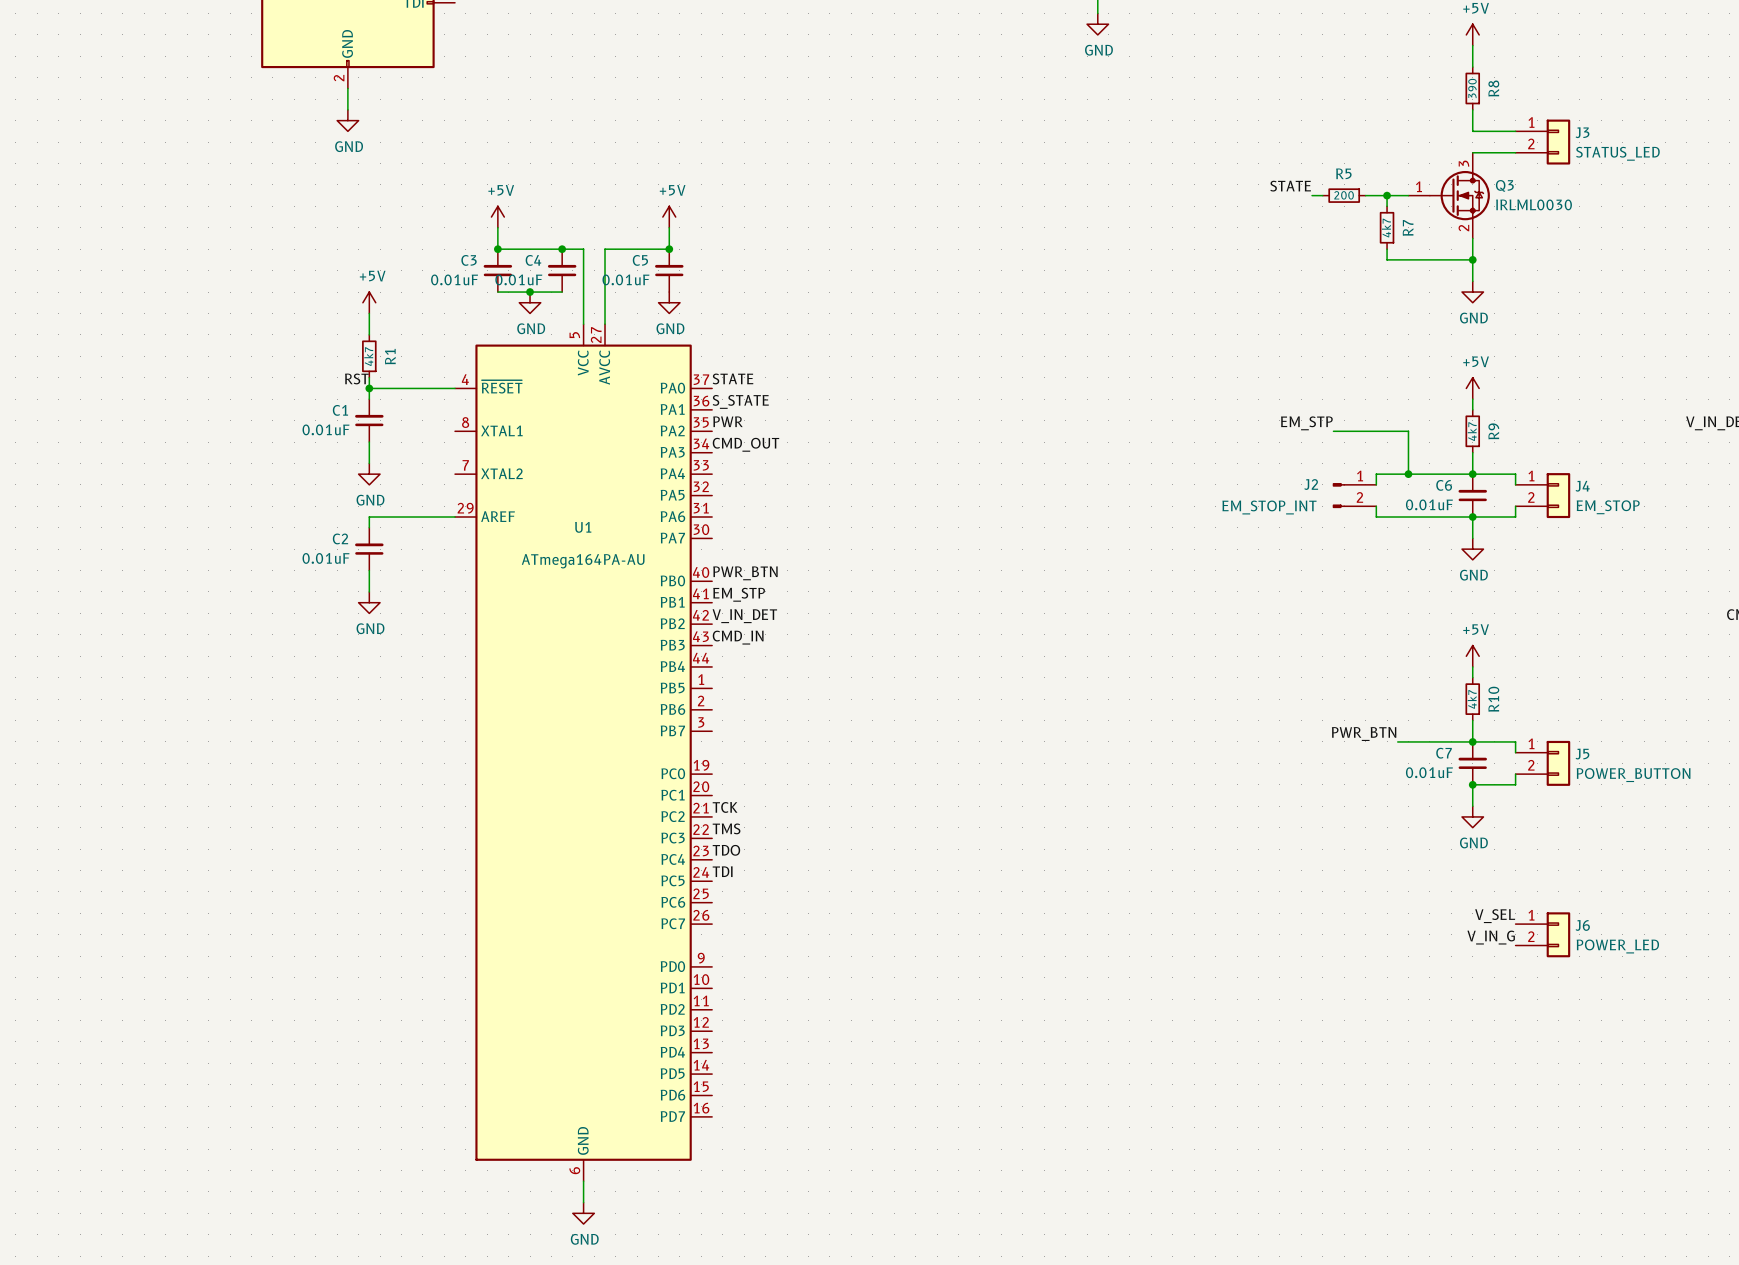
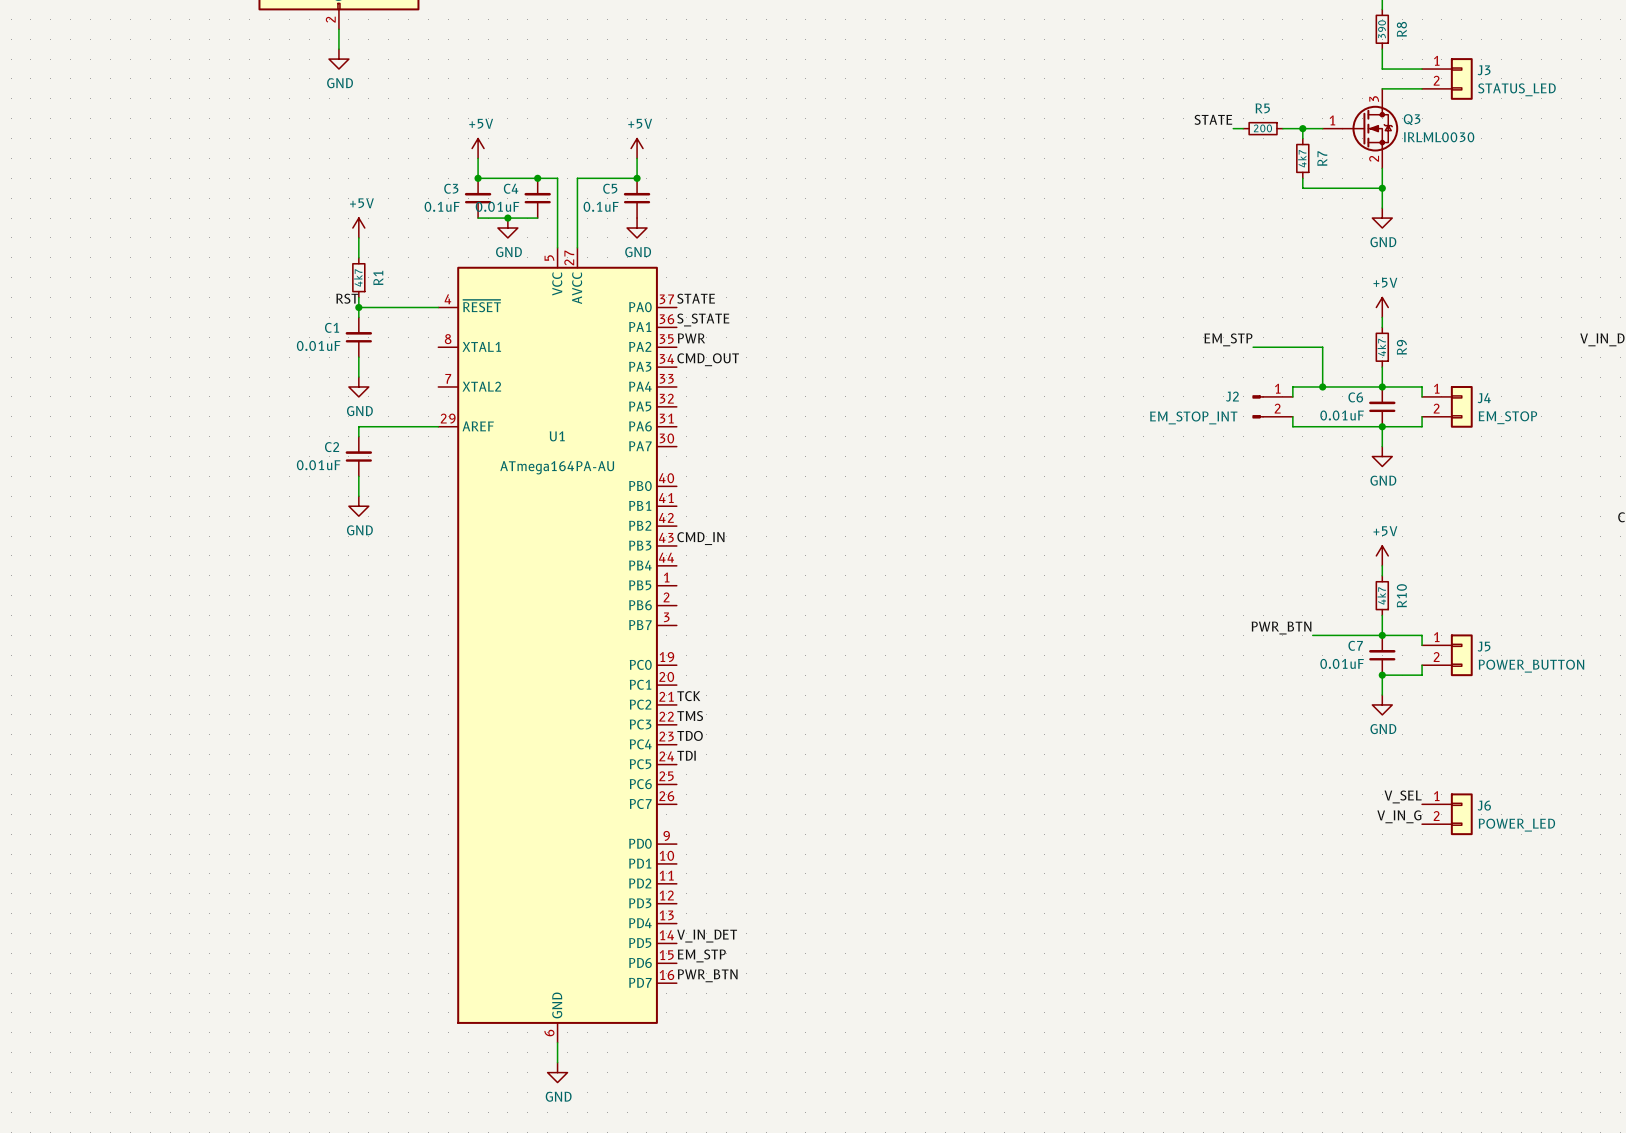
C3 value: 0.01uF (454, 279) -> 0.1uF (442, 206)
C5 value: 0.01uF (625, 279) -> 0.1uF (601, 206)
label: PWR_BTN (745, 573) -> none
label: EM_STP (739, 594) -> none
label: V_IN_DET (744, 616) -> none
label: none -> V_IN_DET (707, 936)
label: none -> EM_STP (701, 955)
label: none -> PWR_BTN (707, 975)

